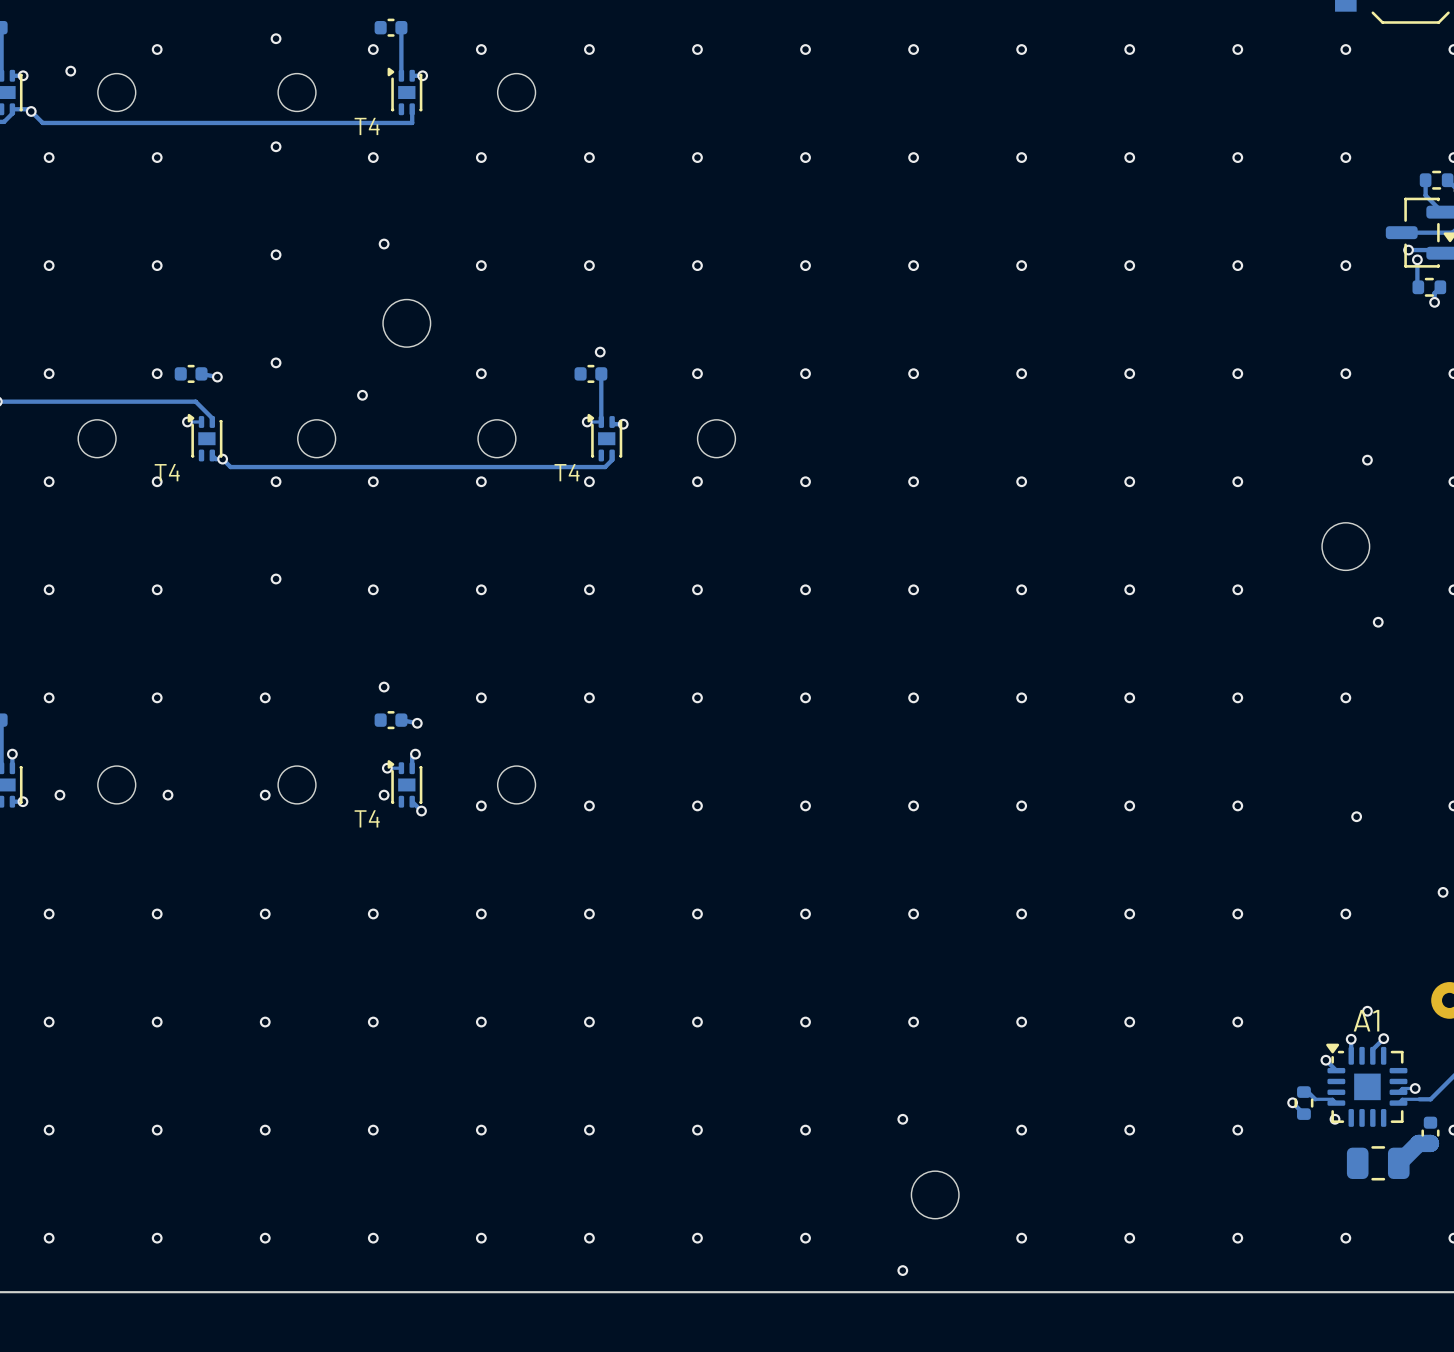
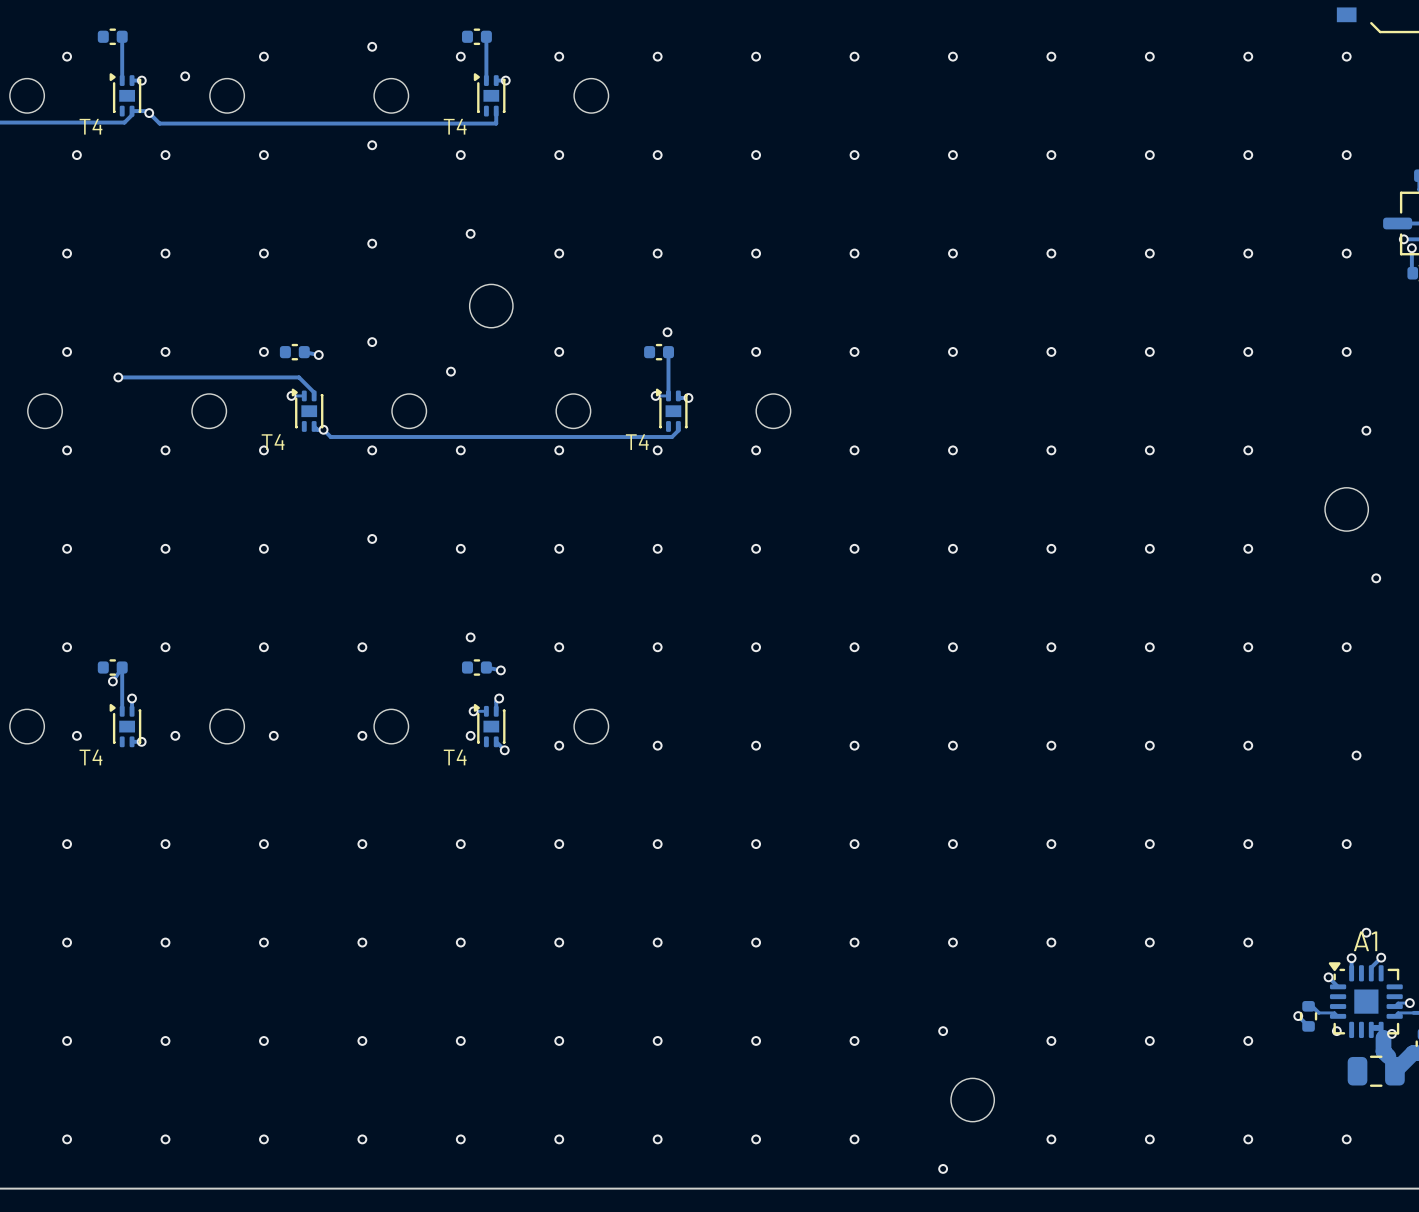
track: none -> (1379, 1027) (1374, 1027)
via: none -> (1391, 1033)
track: none -> (1383, 1037) (1383, 1051) (1388, 1056)

